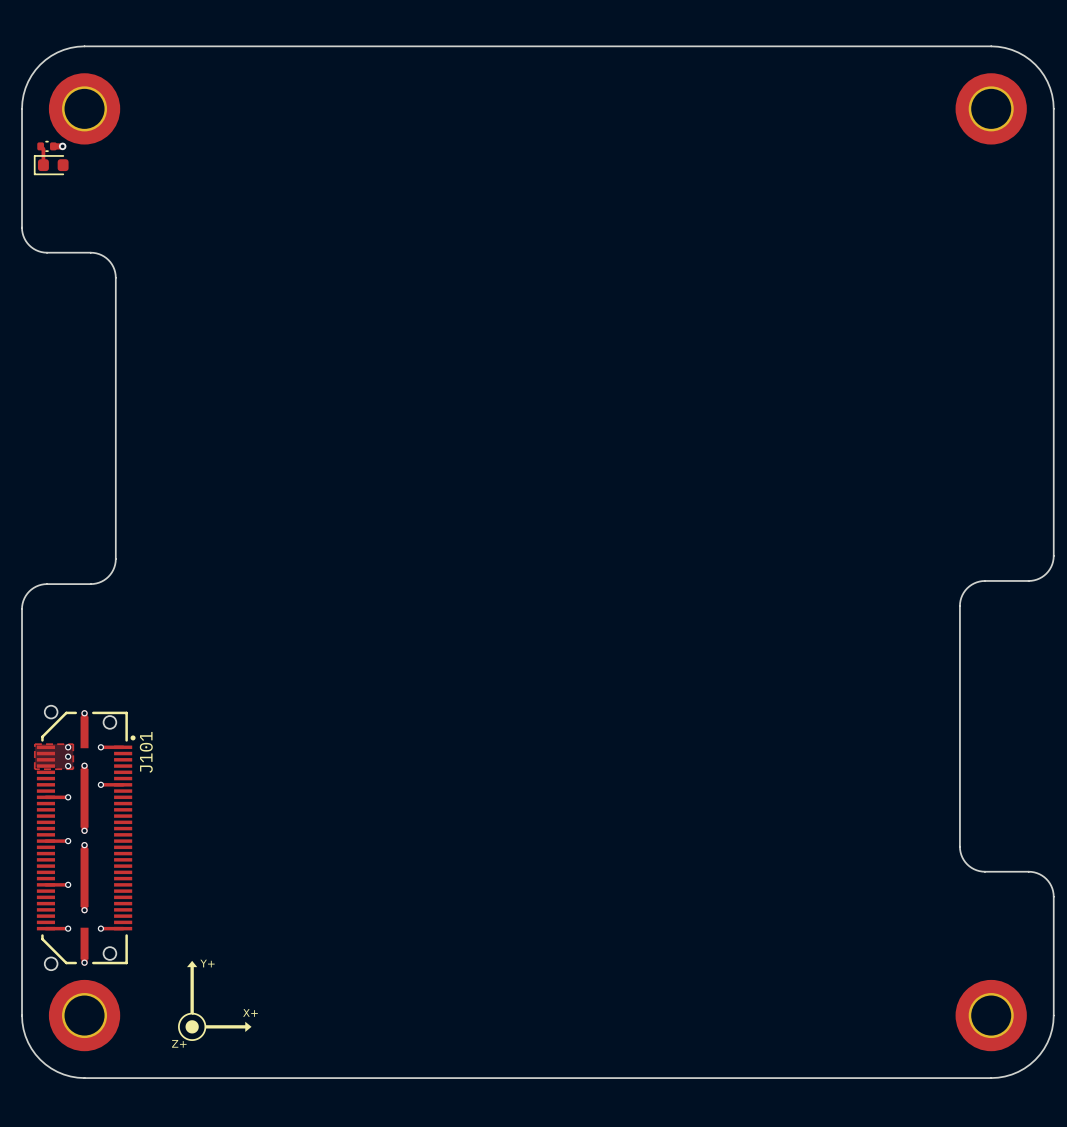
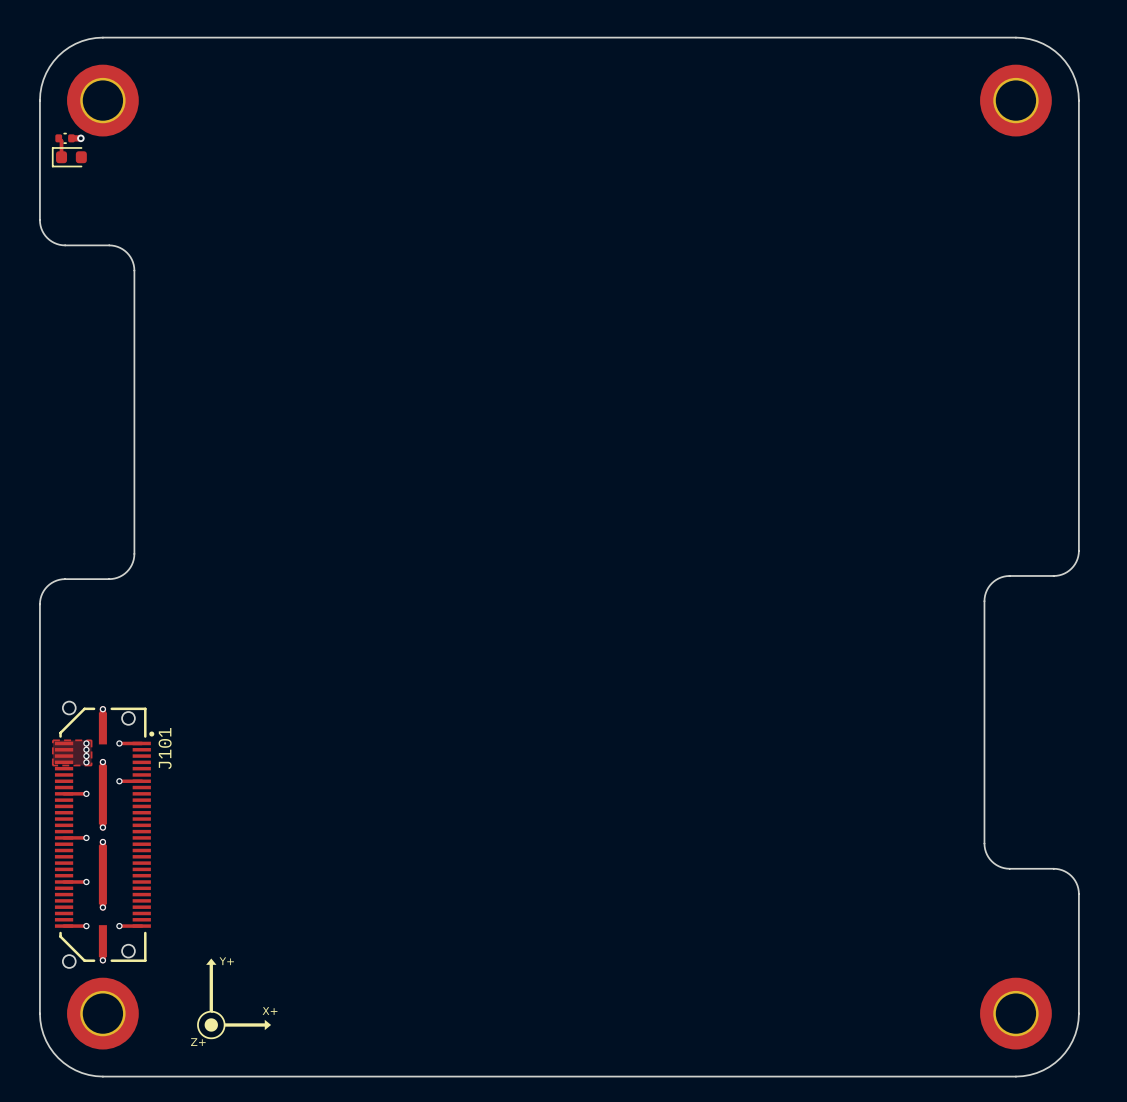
via: none -> (86, 749)
via: (68, 756) -> none
via: none -> (86, 756)

